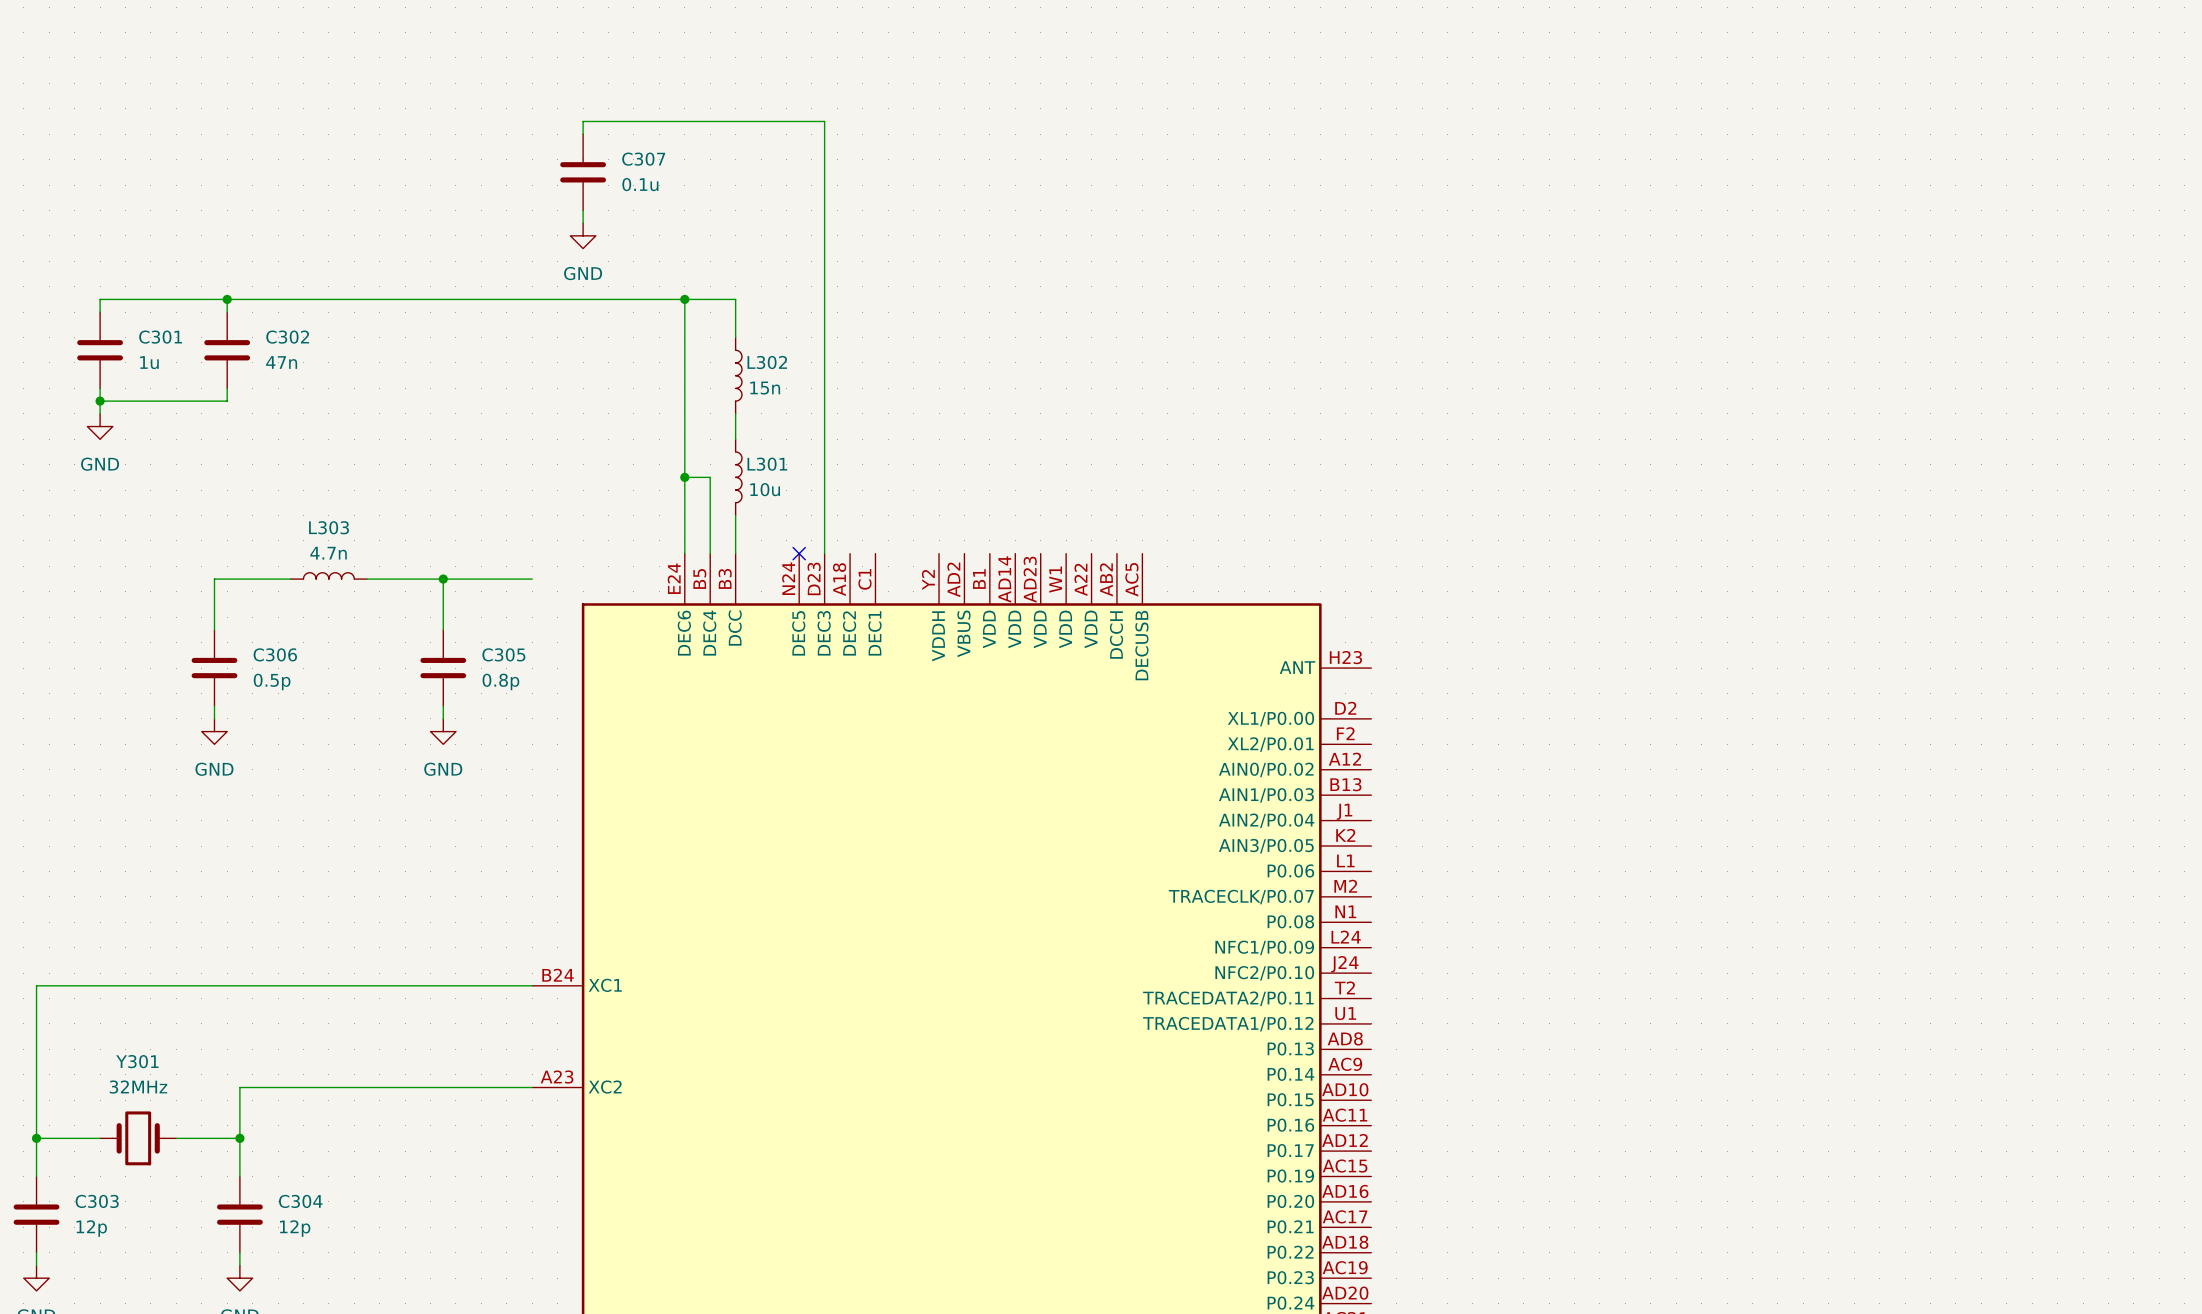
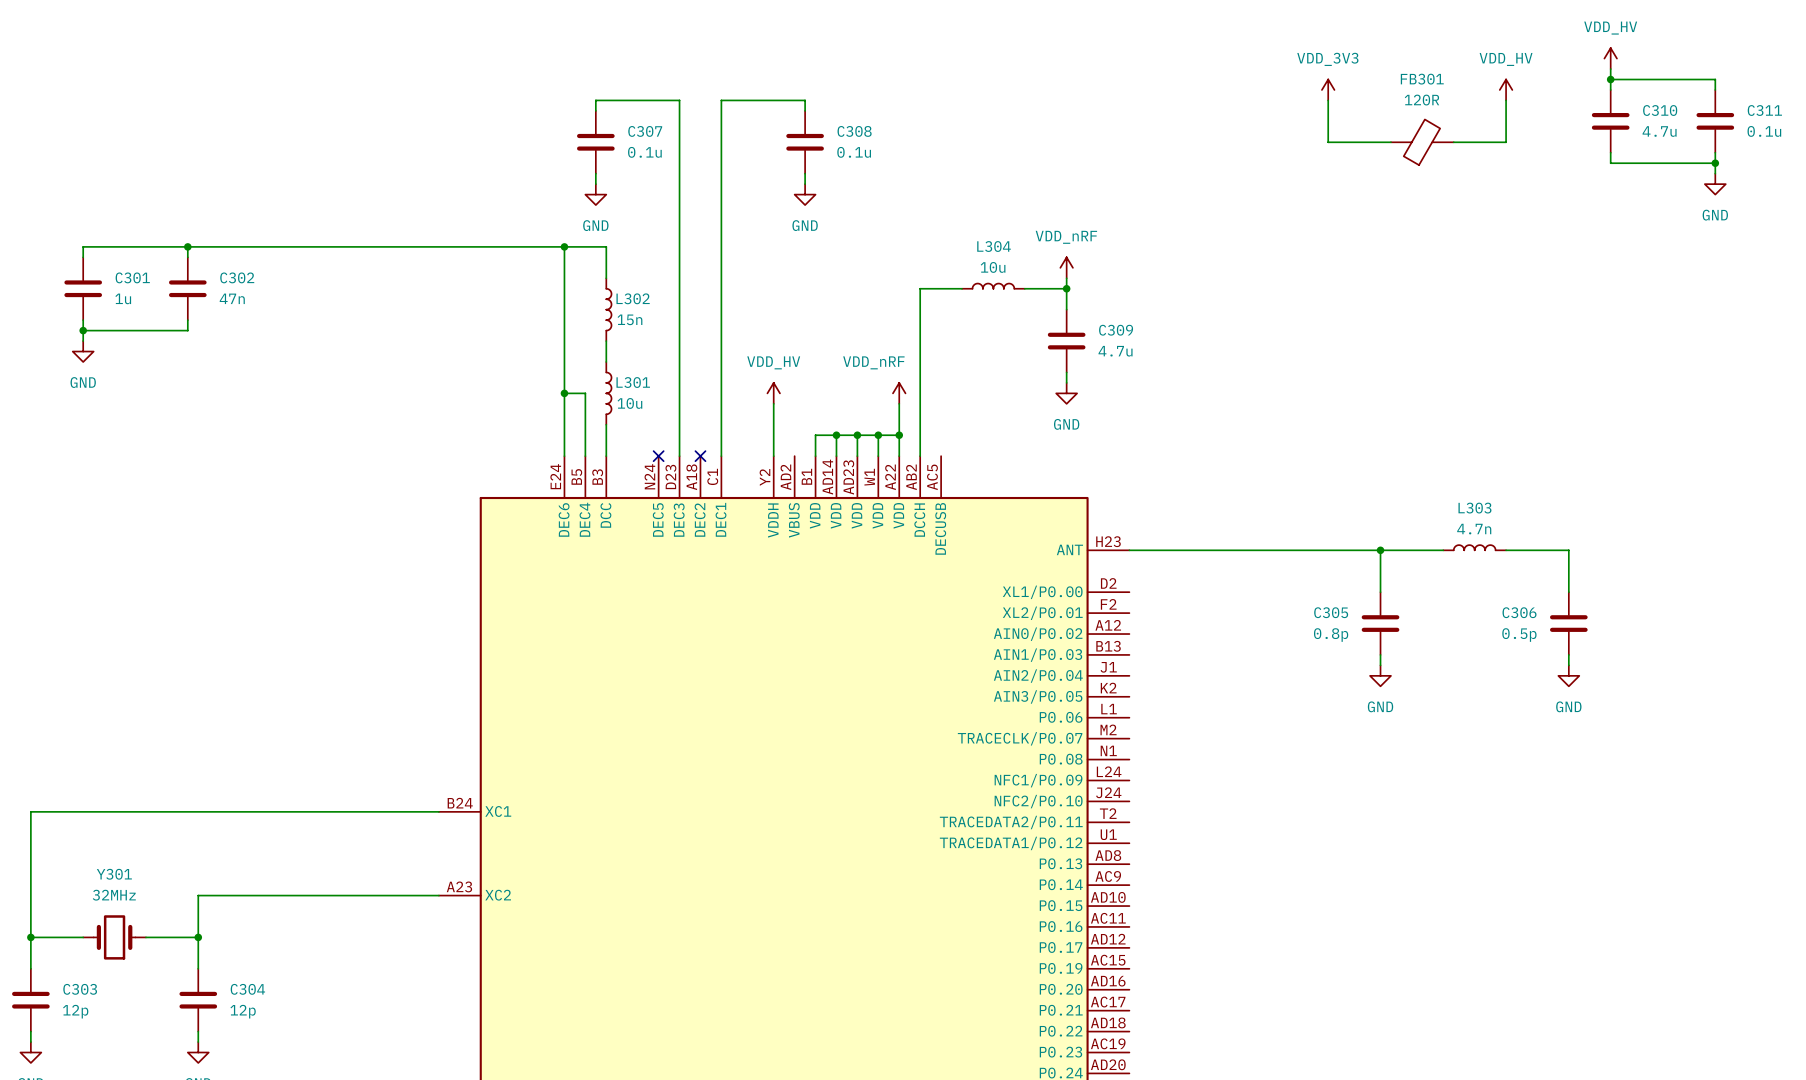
power symbol: none -> VDD_HV (1610, 58)
wire: none -> (1610, 69) (1610, 89)
wire: none -> (1610, 79) (1715, 79) (1715, 89)
junction: none -> (1610, 79)
power symbol: none -> VDD_3V3 (1328, 89)
power symbol: none -> VDD_HV (1506, 89)
wire: (722, 121) (583, 121) (583, 134) -> (595, 100) (595, 110)
wire: none -> (1328, 100) (1328, 142) (1390, 142)
wire: none -> (1506, 100) (1506, 142) (1453, 142)
wire: none -> (805, 110) (805, 100) (721, 100) (721, 456)
C310: none -> 4.7u (1610, 121)
C311: none -> 0.1u (1715, 121)
C307 position: (583, 172) -> (595, 142)
C308: none -> 0.1u (805, 142)
FB301: none -> 120R (1422, 142)
wire: none -> (1610, 152) (1610, 163) (1715, 163)
wire: none -> (1715, 152) (1715, 173)
junction: none -> (1715, 163)
wire: (583, 210) (583, 223) -> (595, 173) (595, 184)
wire: none -> (805, 173) (805, 184)
power symbol: none -> GND (1715, 184)
power symbol position: GND (583, 235) -> GND (595, 194)
power symbol: none -> GND (805, 194)
power symbol: none -> VDD_nRF (1066, 267)
wire: none -> (1066, 278) (1066, 309)
L304: none -> 10u (993, 286)
wire: none -> (962, 288) (920, 288) (920, 456)
wire: none -> (1024, 288) (1066, 288)
junction: none -> (1066, 288)
C309: none -> 4.7u (1066, 341)
wire: none -> (1066, 372) (1066, 382)
power symbol: none -> VDD_HV (773, 393)
power symbol: none -> VDD_nRF (899, 393)
power symbol: none -> GND (1066, 393)
wire: none -> (773, 403) (773, 456)
wire: none -> (899, 403) (899, 456)
wire: none -> (836, 435) (836, 456)
junction: none -> (836, 435)
wire: none -> (857, 435) (857, 456)
junction: none -> (857, 435)
wire: none -> (878, 435) (878, 456)
junction: none -> (878, 435)
wire: none -> (899, 435) (815, 435) (815, 456)
junction: none -> (899, 435)
no-connect mark: none -> (700, 456)
L303 position: (328, 575) -> (1474, 547)
wire: (290, 579) (214, 579) (214, 629) -> none
wire: (367, 579) (532, 579) -> none
wire: (443, 579) (443, 629) -> none
junction: (443, 579) -> none
C306 name position: C306 (275, 654) -> C306 (1519, 612)
C305 name position: C305 (503, 654) -> C305 (1331, 612)
C306 position: (214, 668) -> (1568, 623)
C305 position: (443, 668) -> (1380, 623)
wire: none -> (1129, 550) (1443, 550)
wire: none -> (1380, 550) (1380, 592)
junction: none -> (1380, 550)
wire: none -> (1506, 550) (1568, 550) (1568, 592)
C306 value position: 0.5p (272, 681) -> 0.5p (1519, 635)
C305 value position: 0.8p (500, 681) -> 0.8p (1331, 635)
wire: (214, 706) (214, 718) -> none
wire: (443, 706) (443, 718) -> none
power symbol: GND (214, 731) -> none
power symbol: GND (443, 731) -> none
wire: none -> (1380, 654) (1380, 665)
wire: none -> (1568, 654) (1568, 665)
power symbol: none -> GND (1380, 675)
power symbol: none -> GND (1568, 675)

